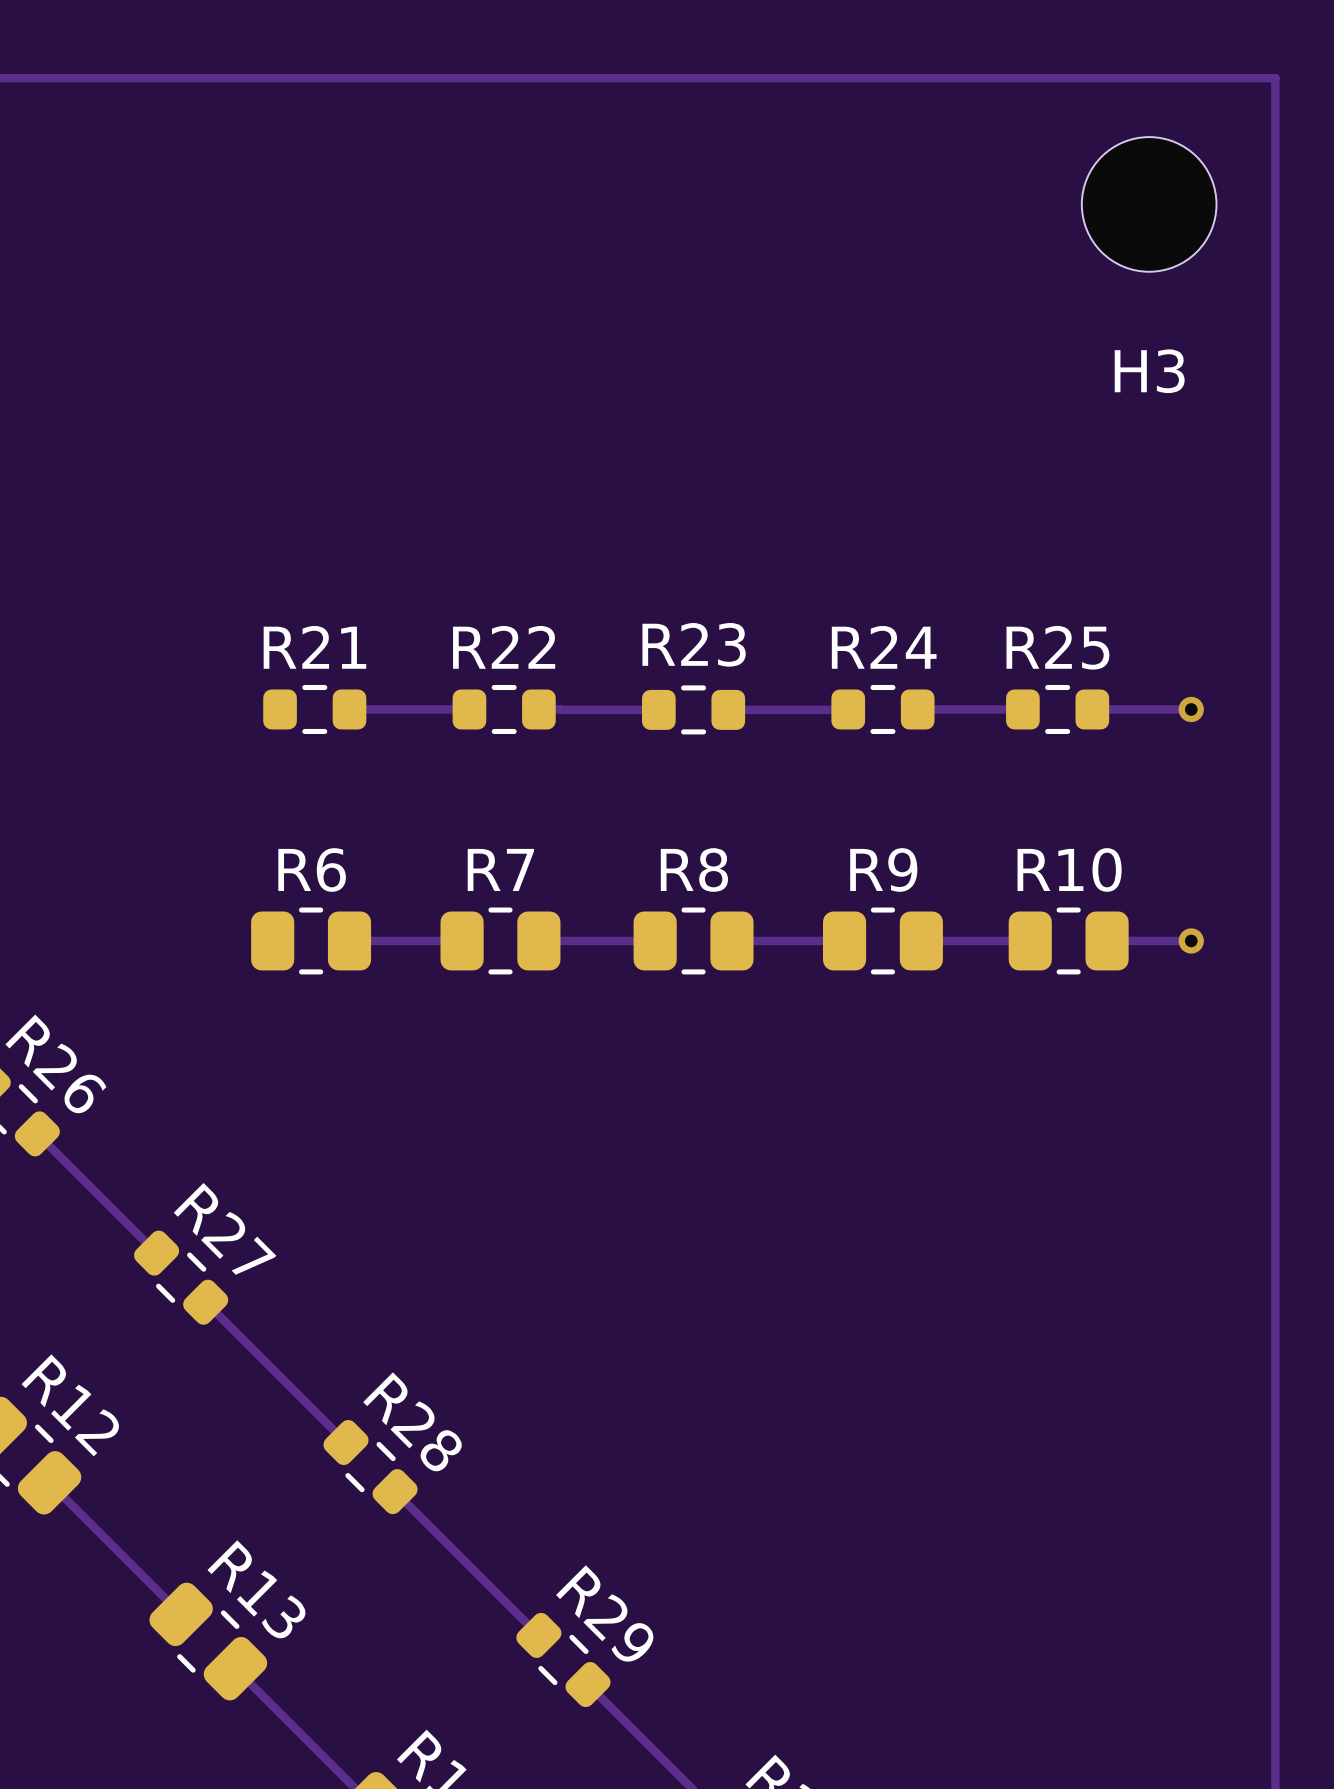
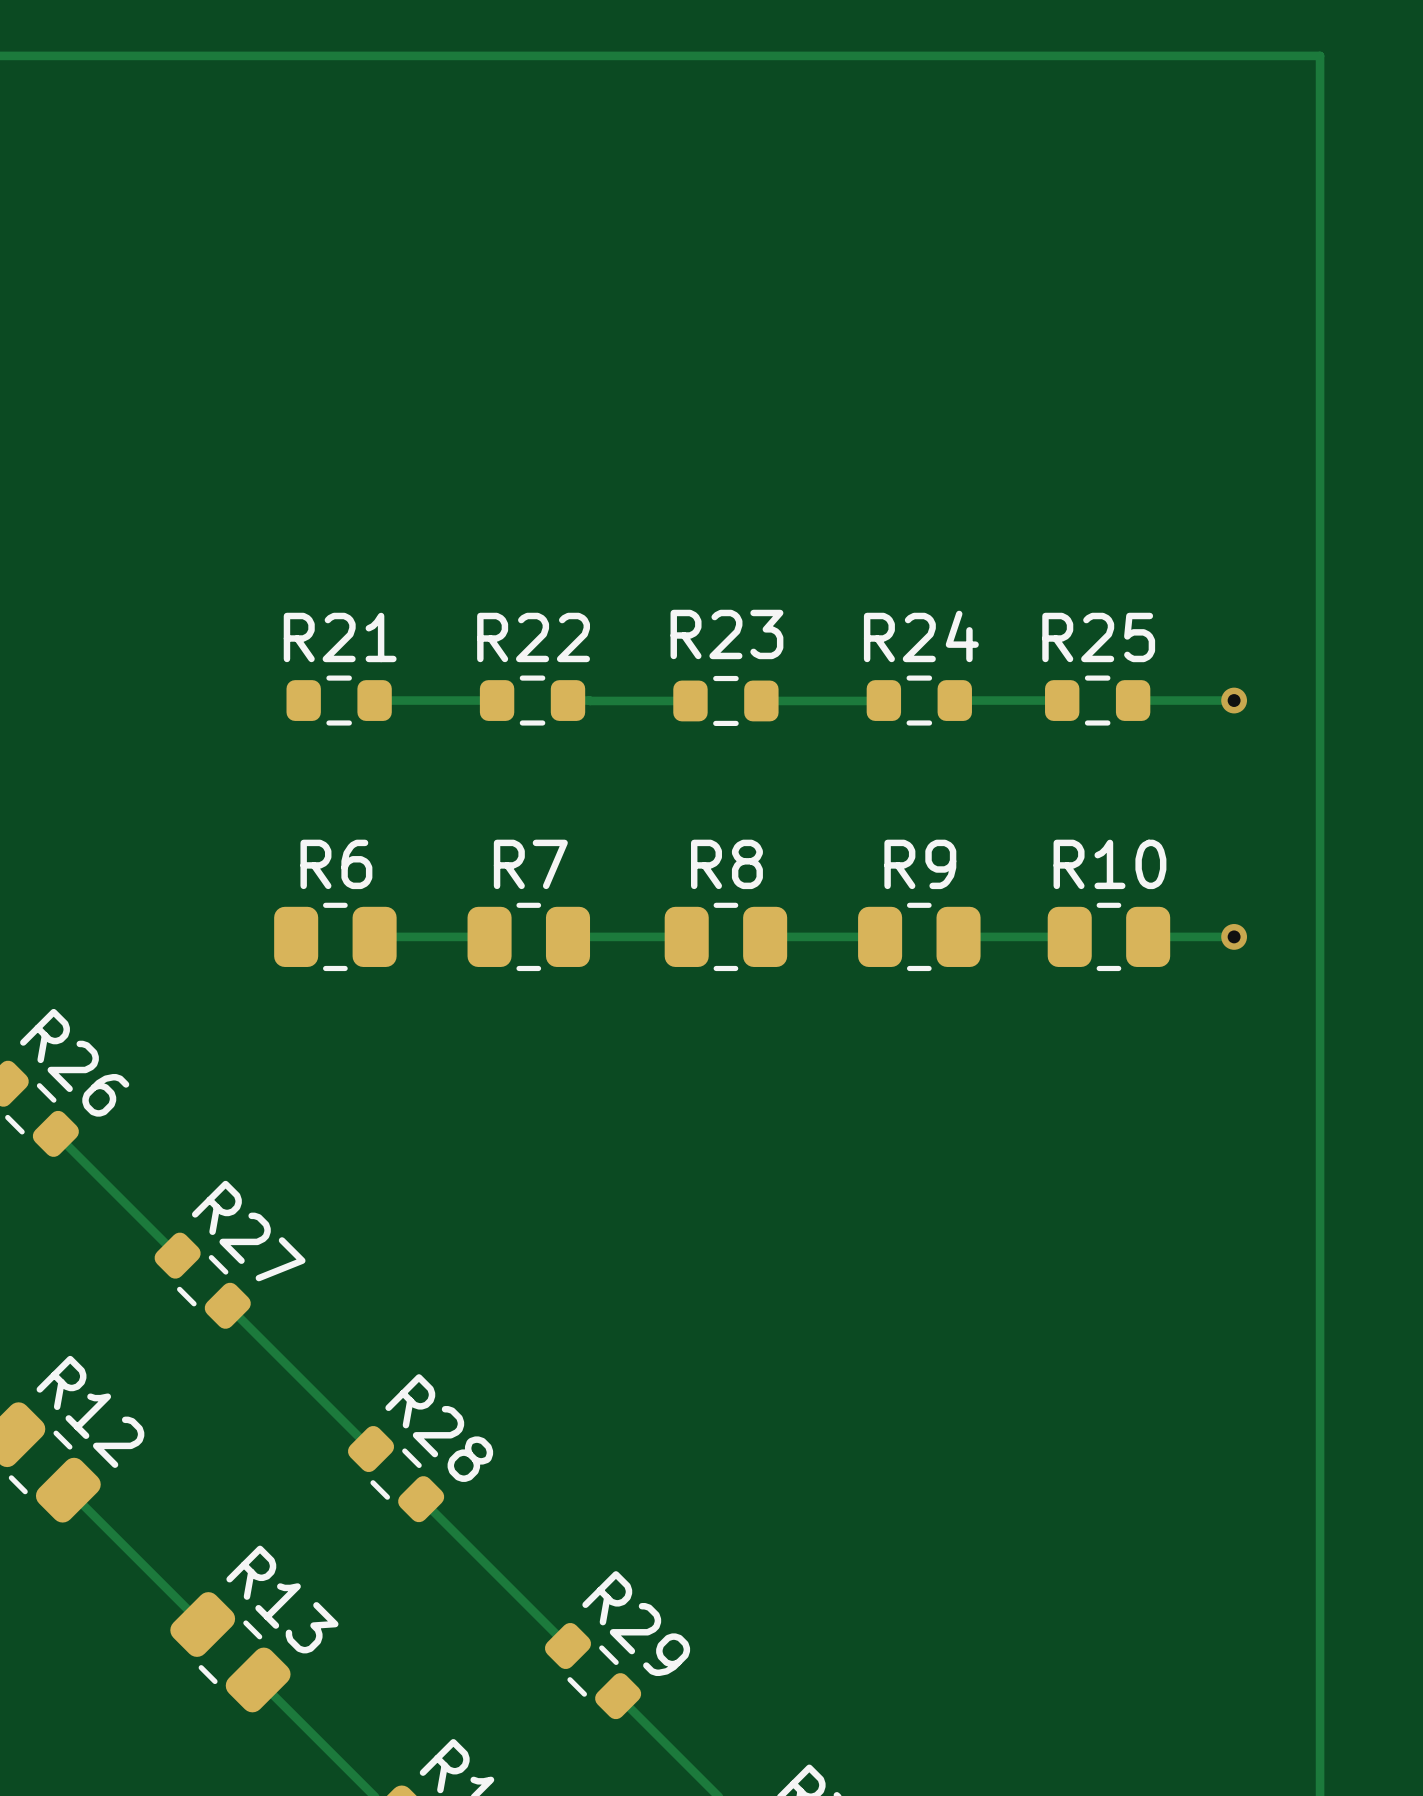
H3: (1149, 204) -> none

